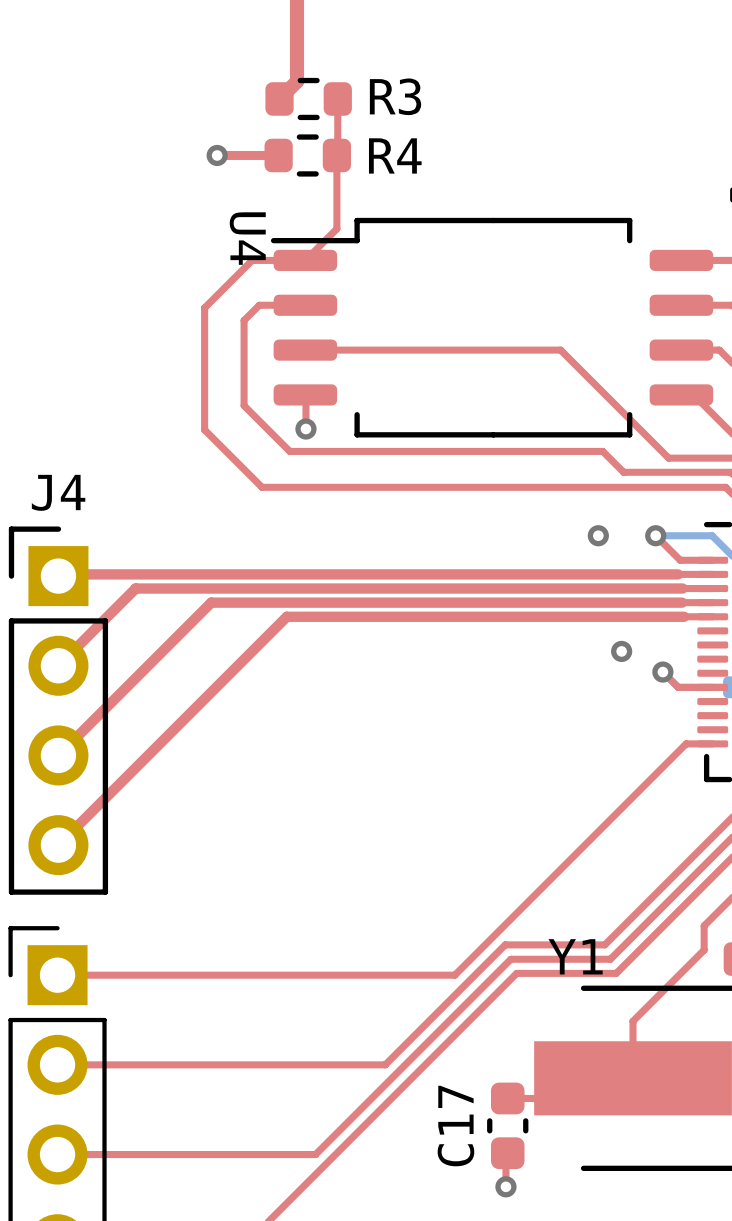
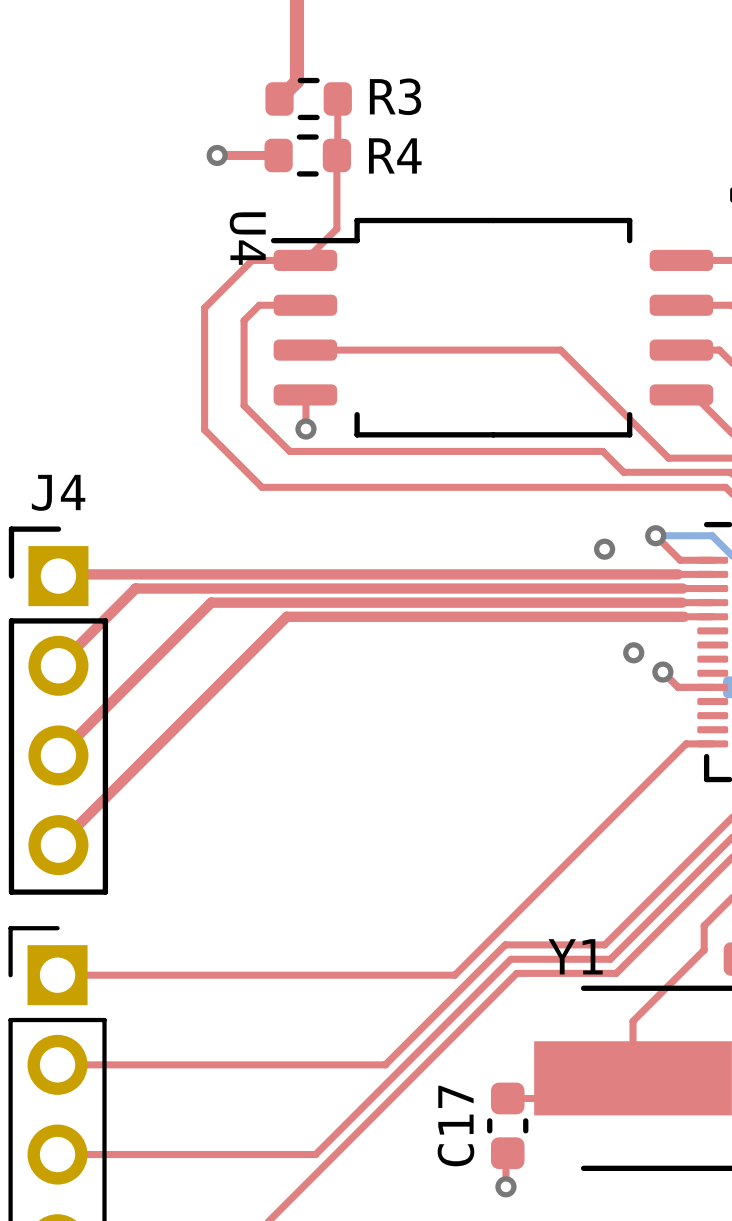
via position: (598, 535) -> (604, 549)
via position: (621, 651) -> (633, 652)

